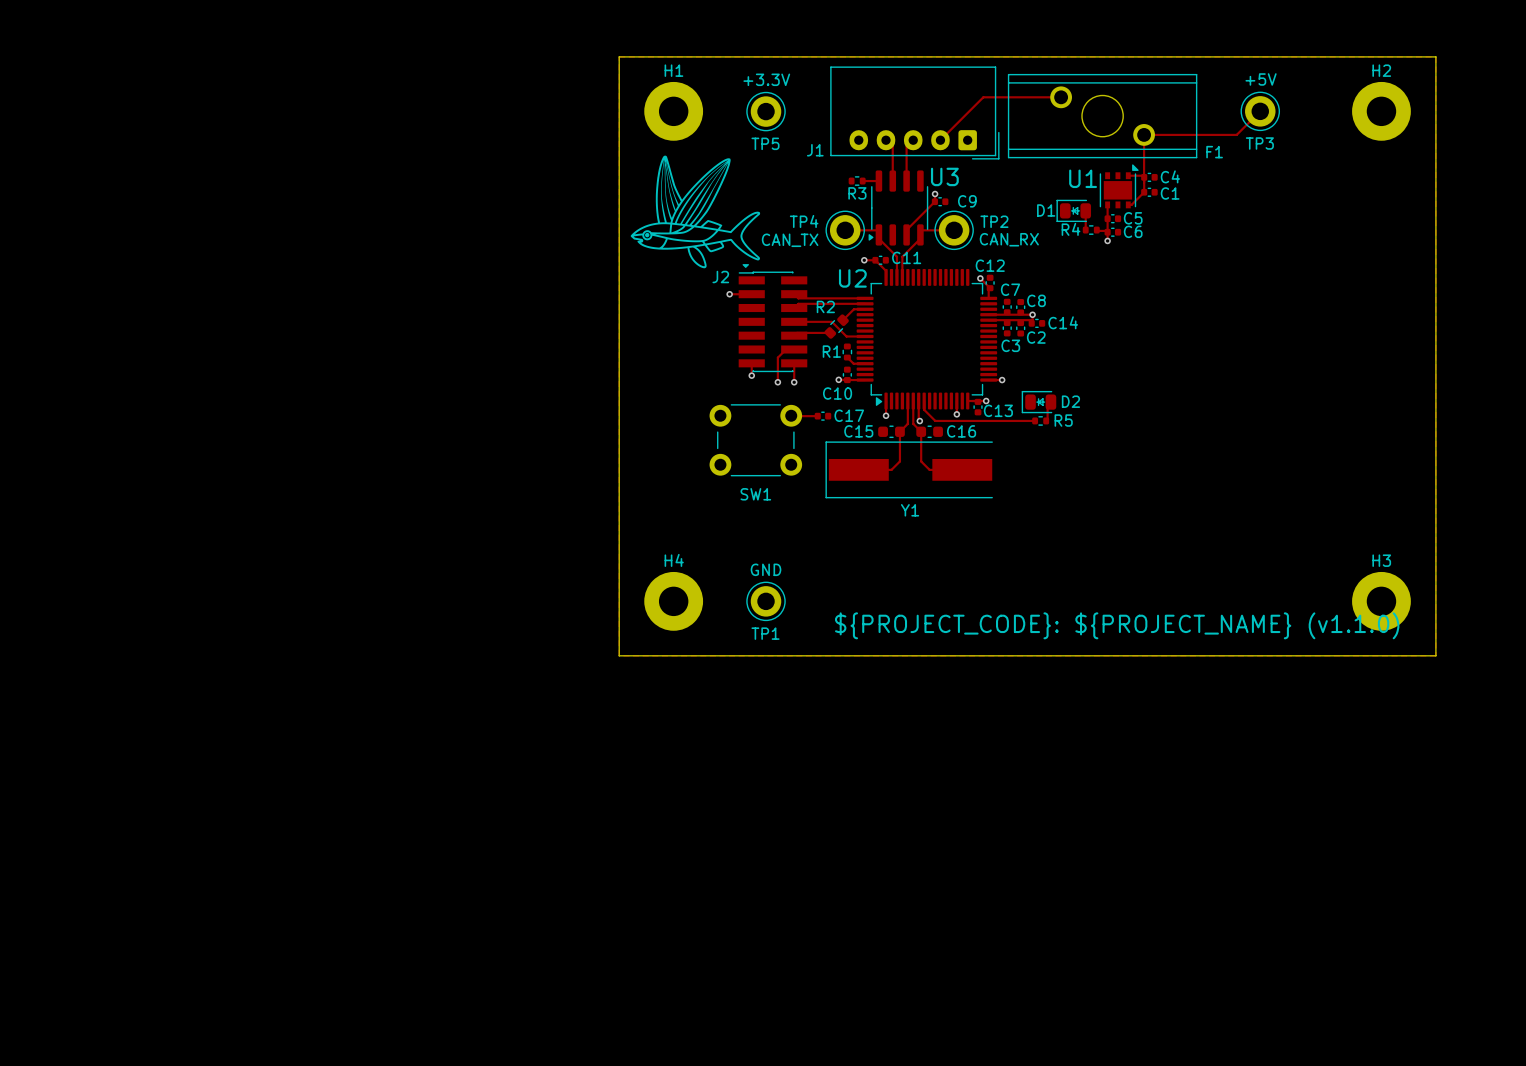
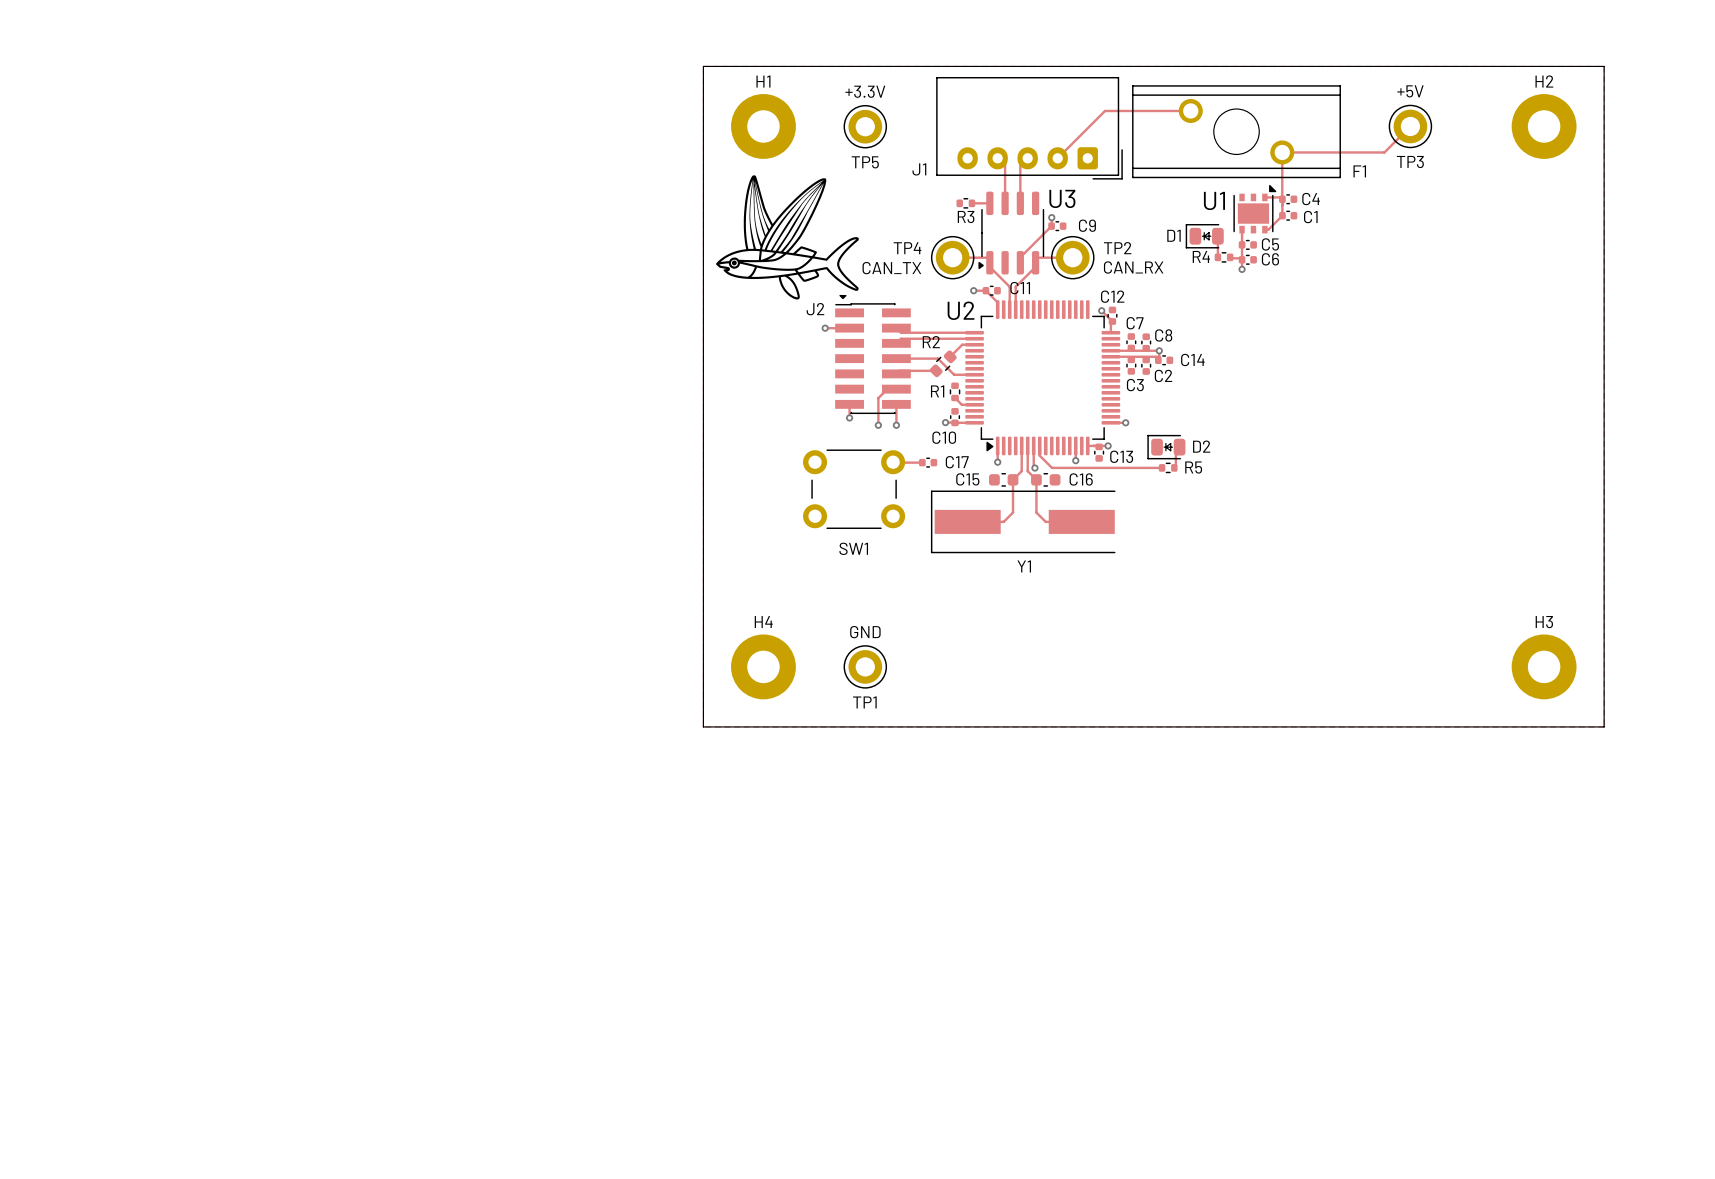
text: ${PROJECT_CODE}: ${PROJECT_NAME} (v1.1.0) (1117, 625) -> none

